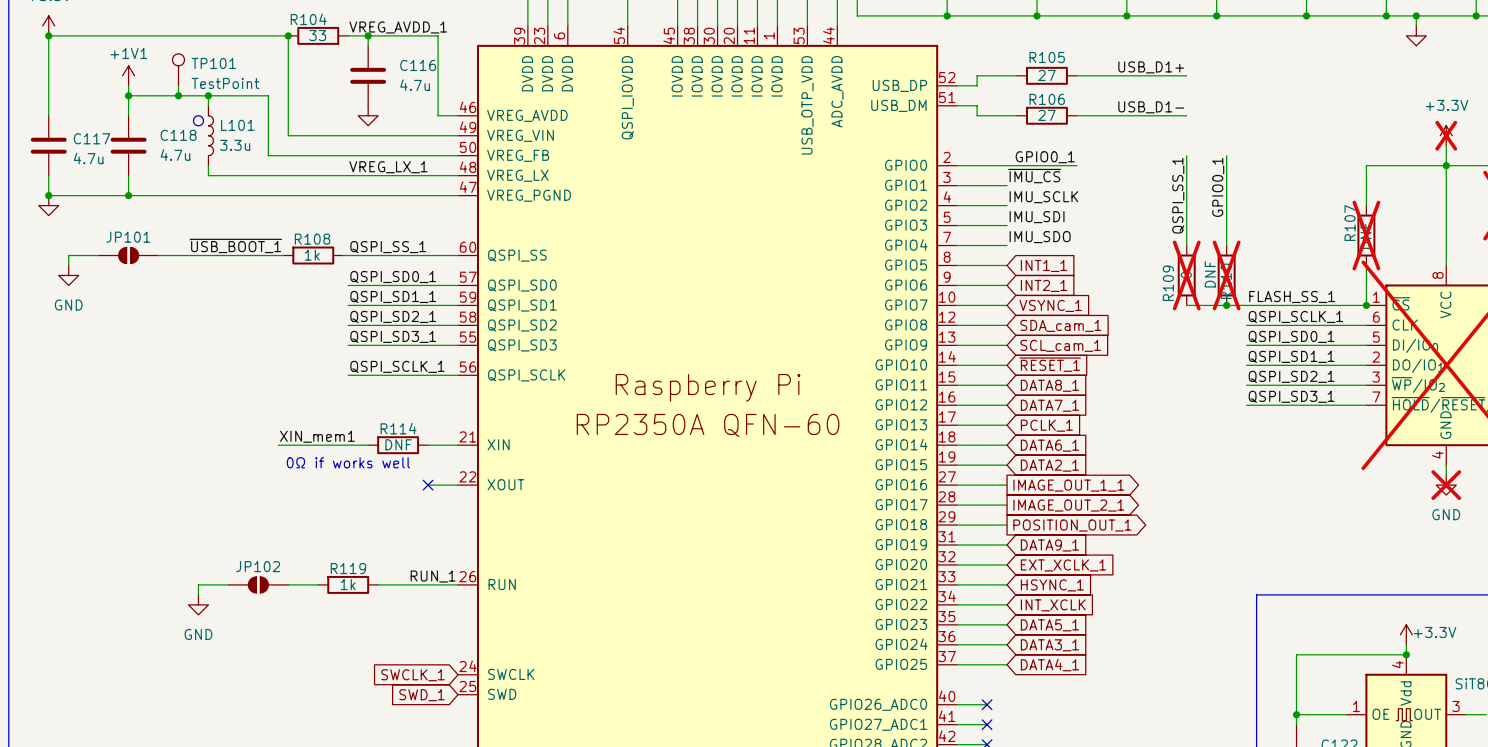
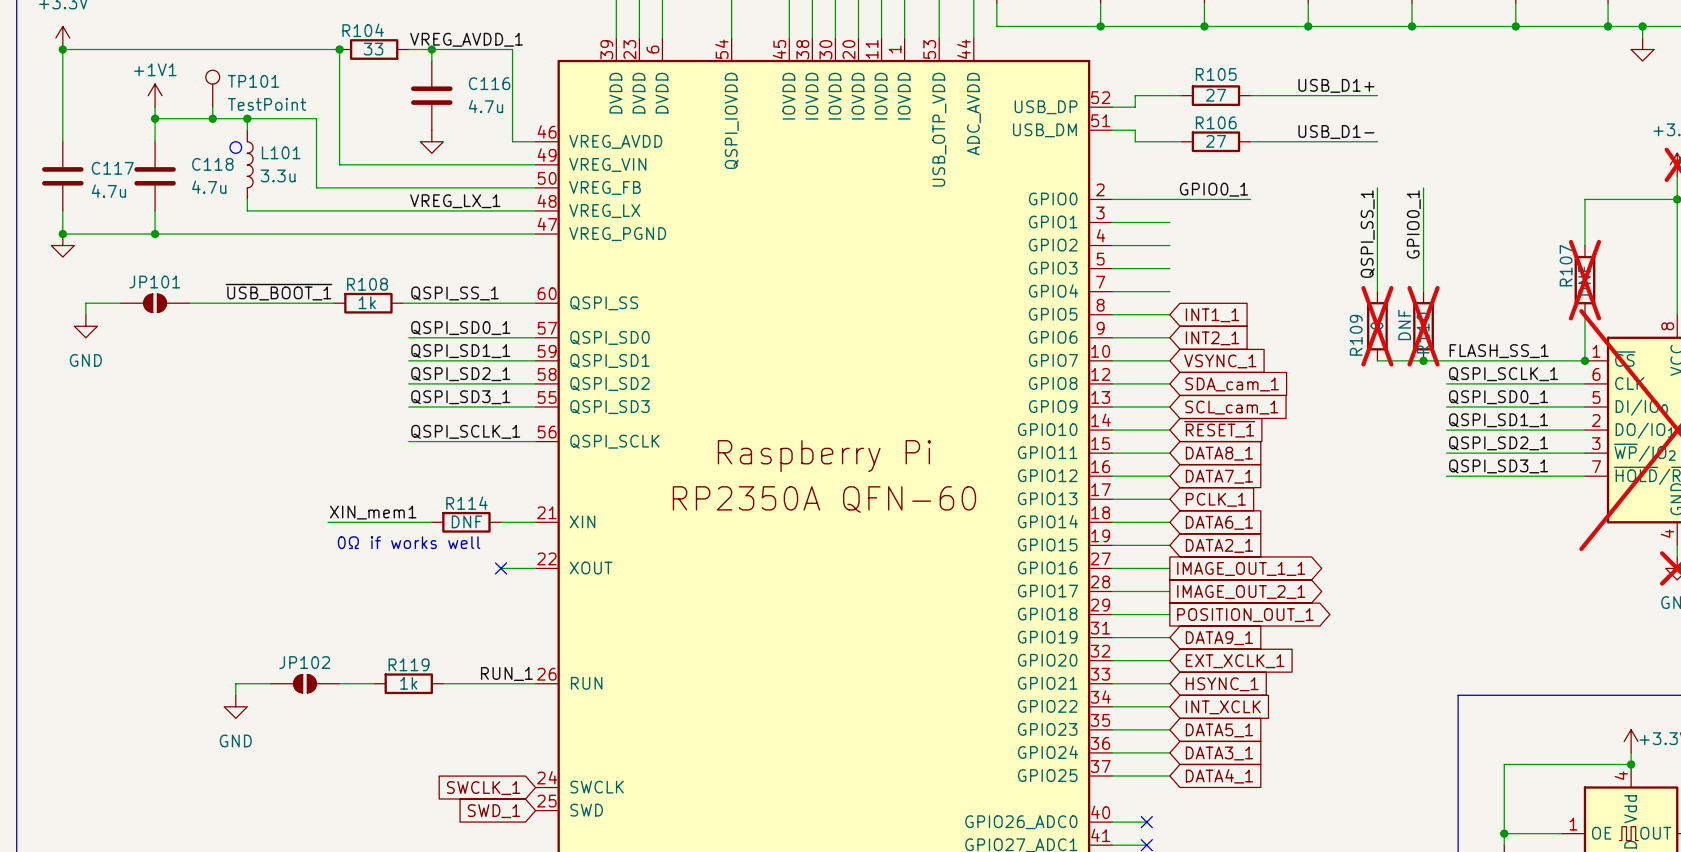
label: ~{IMU_CS} (1034, 176) -> none
label: IMU_SCLK (1043, 197) -> none
label: IMU_SDI (1037, 217) -> none
label: IMU_SDO (1040, 237) -> none

